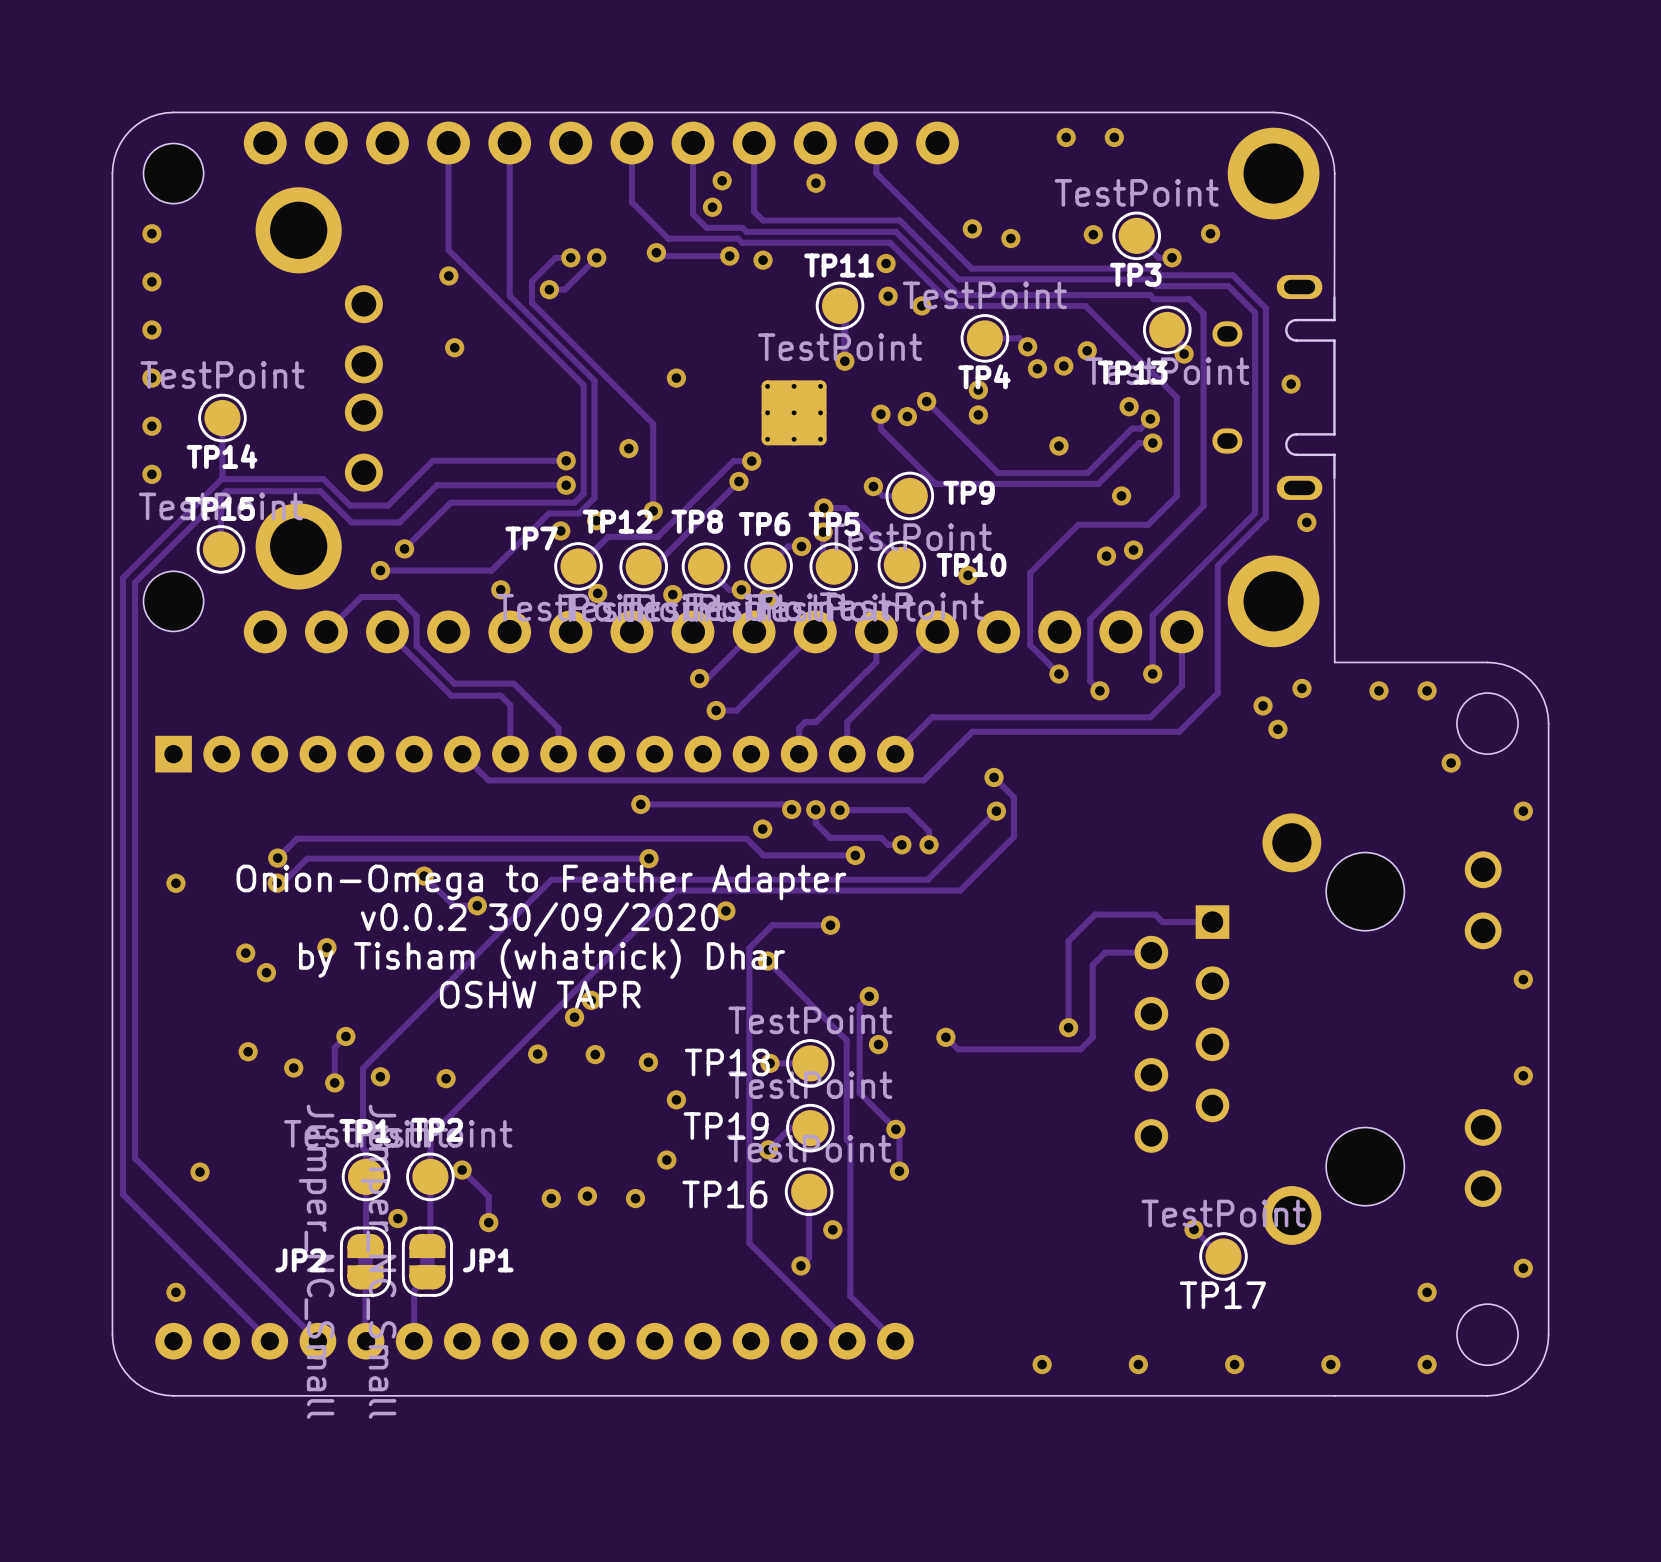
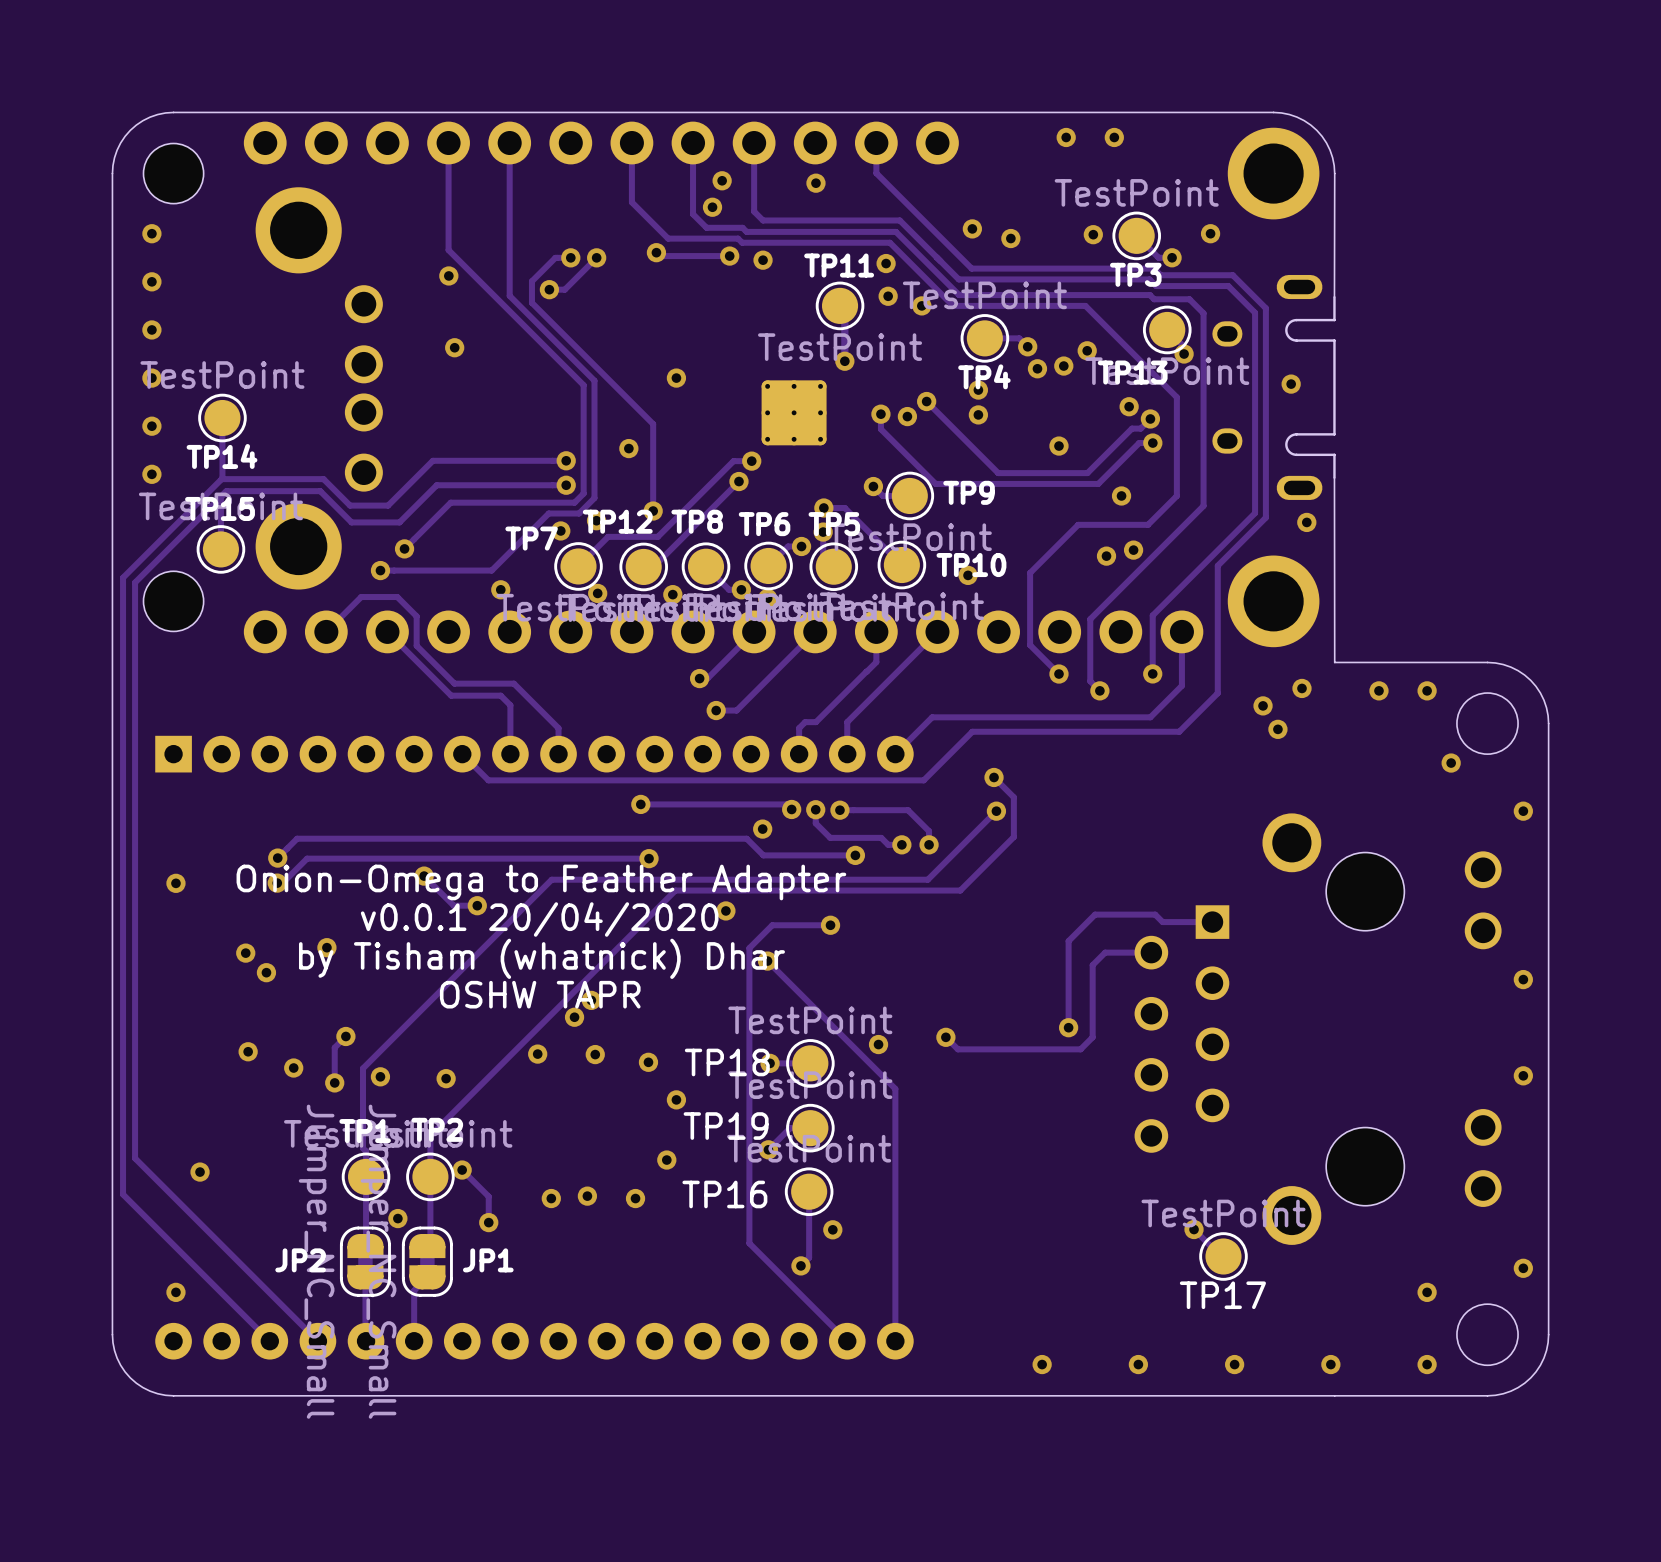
text: v0.0.2 30/09/2020 (539, 919) -> v0.0.1 20/04/2020 (539, 919)
track: (869, 996) (859, 1006) (859, 1093) (899, 1132) (899, 1171) -> none
via: (869, 996) -> none
track: (846, 1040) (846, 1140) (850, 1143) (850, 1296) (895, 1341) -> (846, 1040) (895, 1088) (895, 1341)
via: (895, 1129) -> none
via: (899, 1171) -> none

